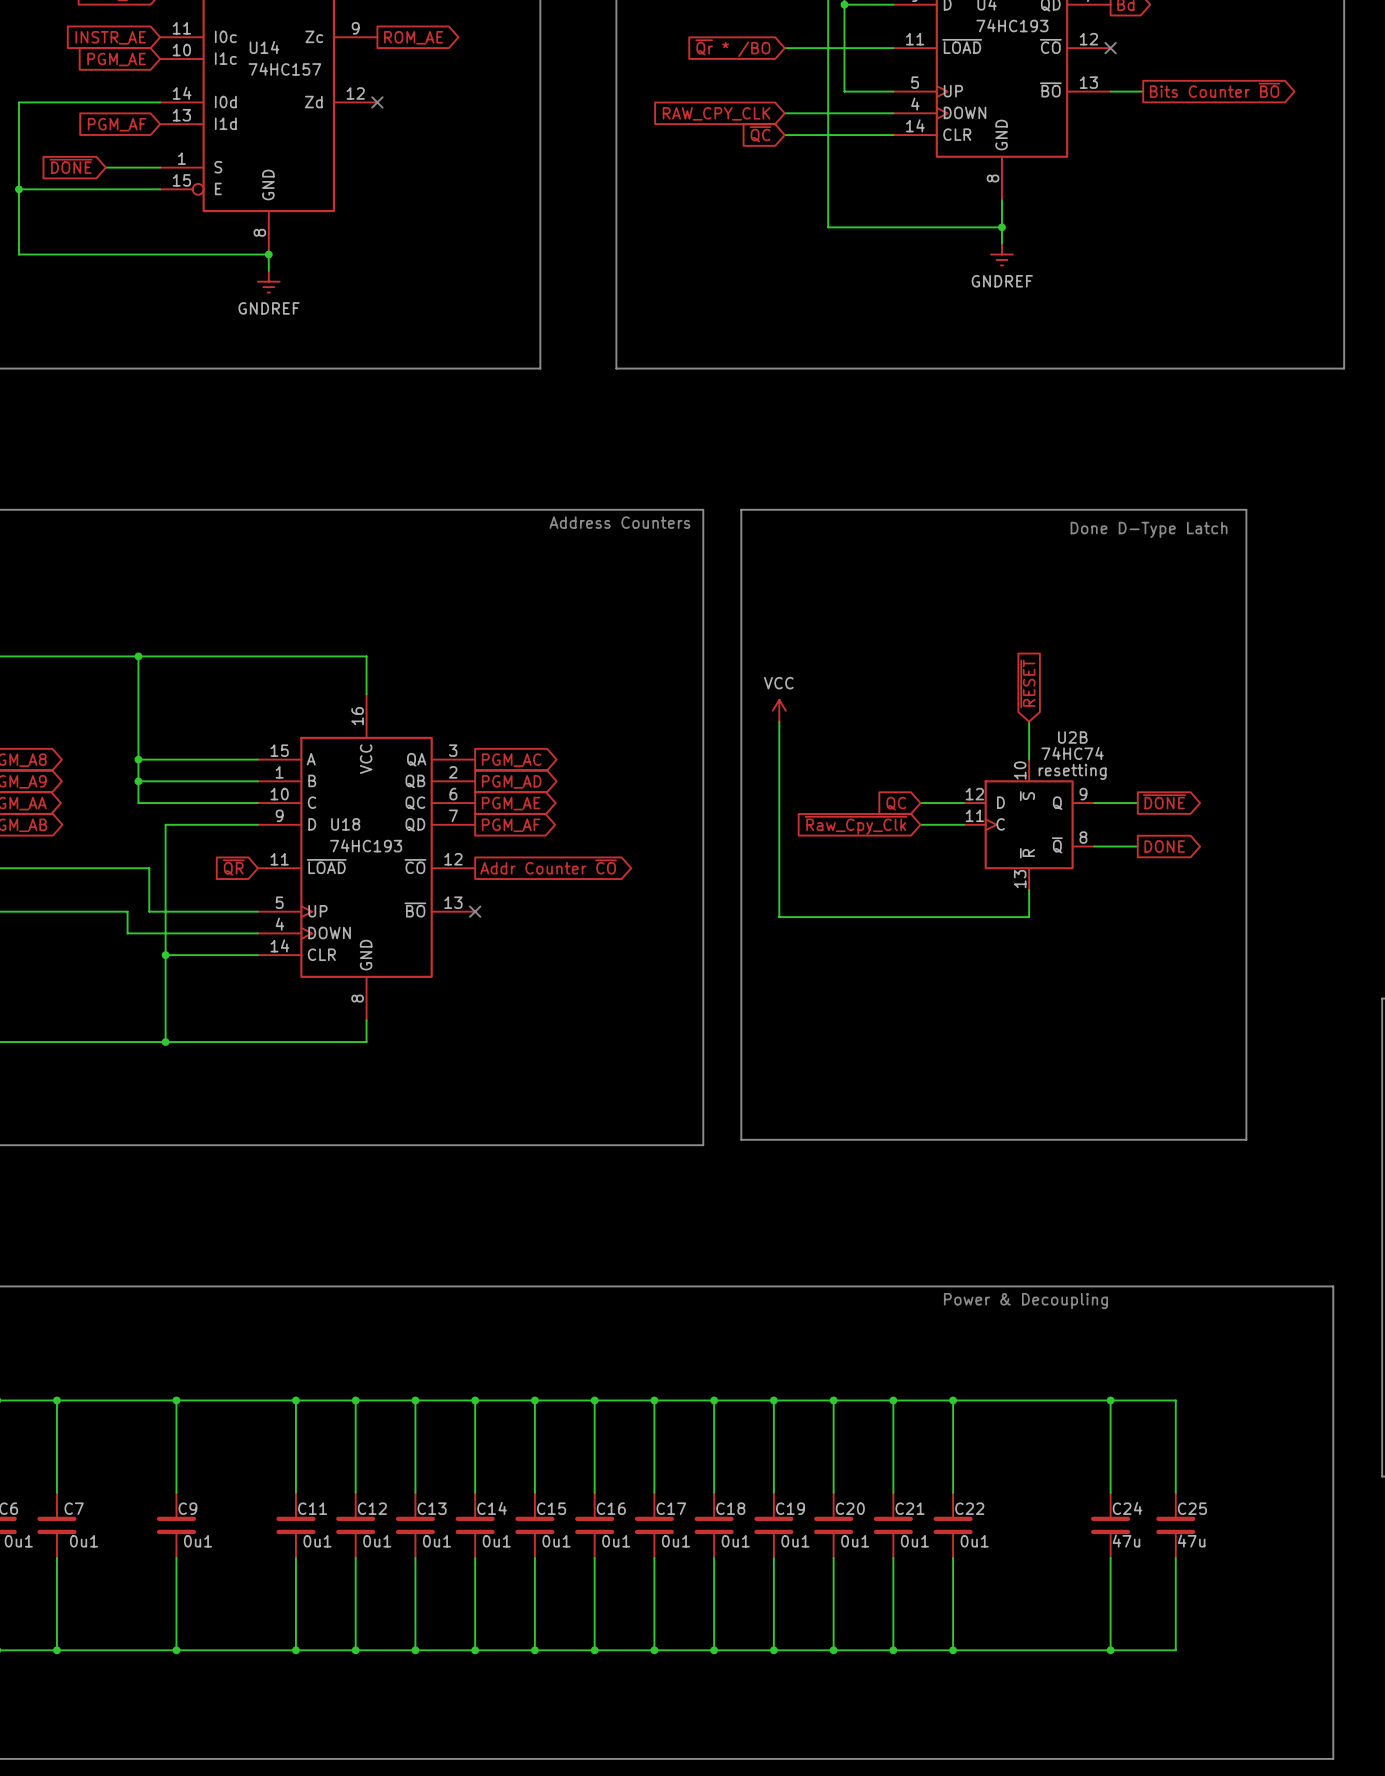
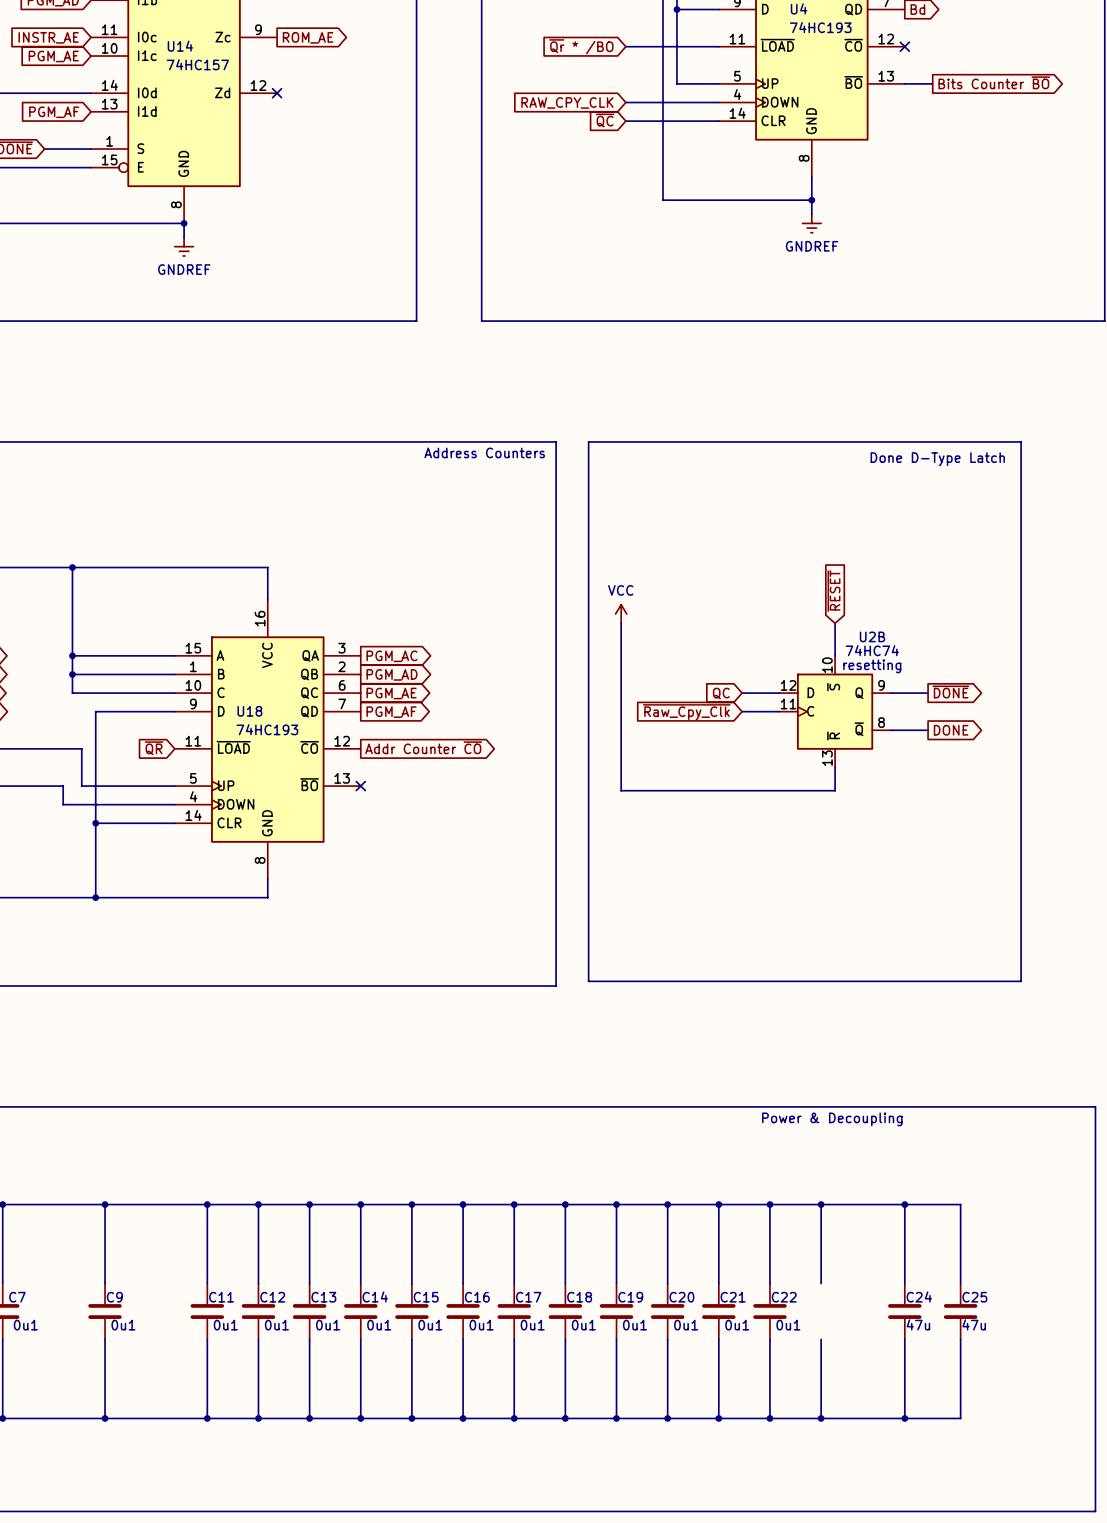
wire: none -> (821, 1204) (821, 1283)
junction: none -> (821, 1204)
wire: none -> (821, 1339) (821, 1418)
junction: none -> (821, 1418)

